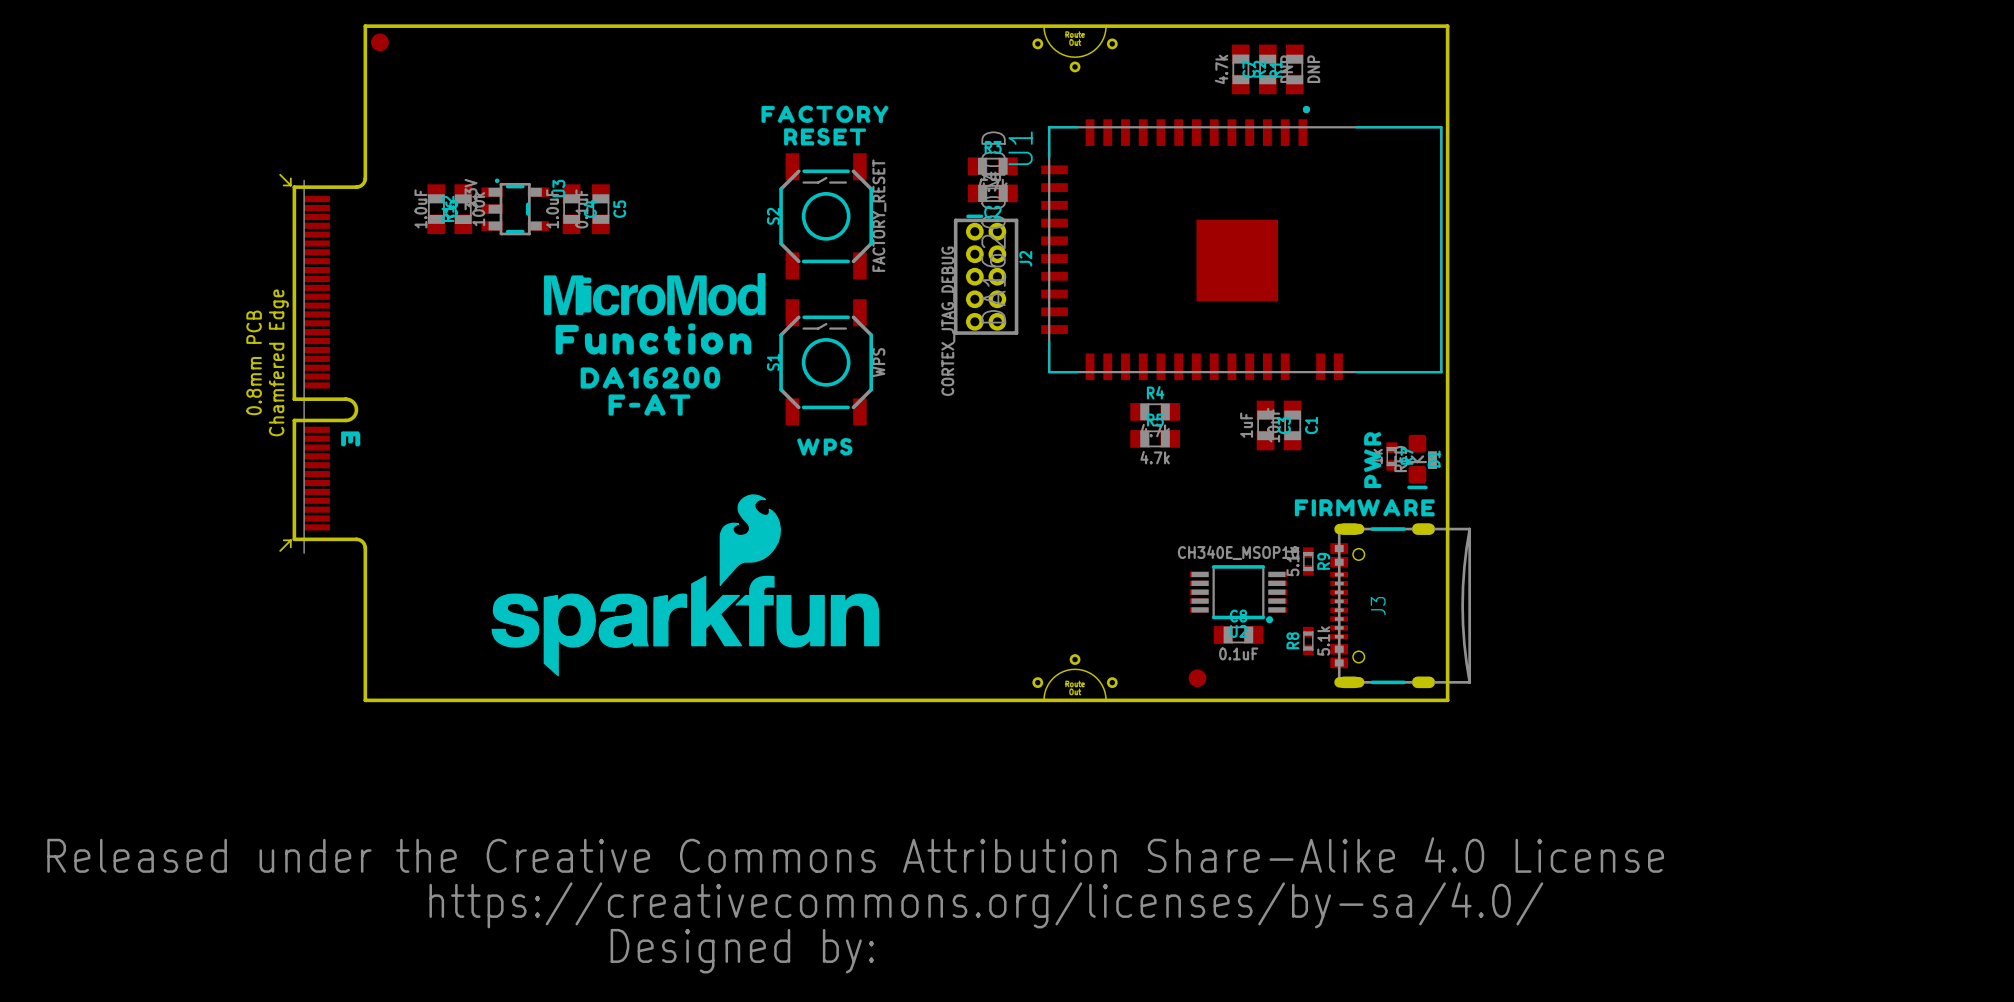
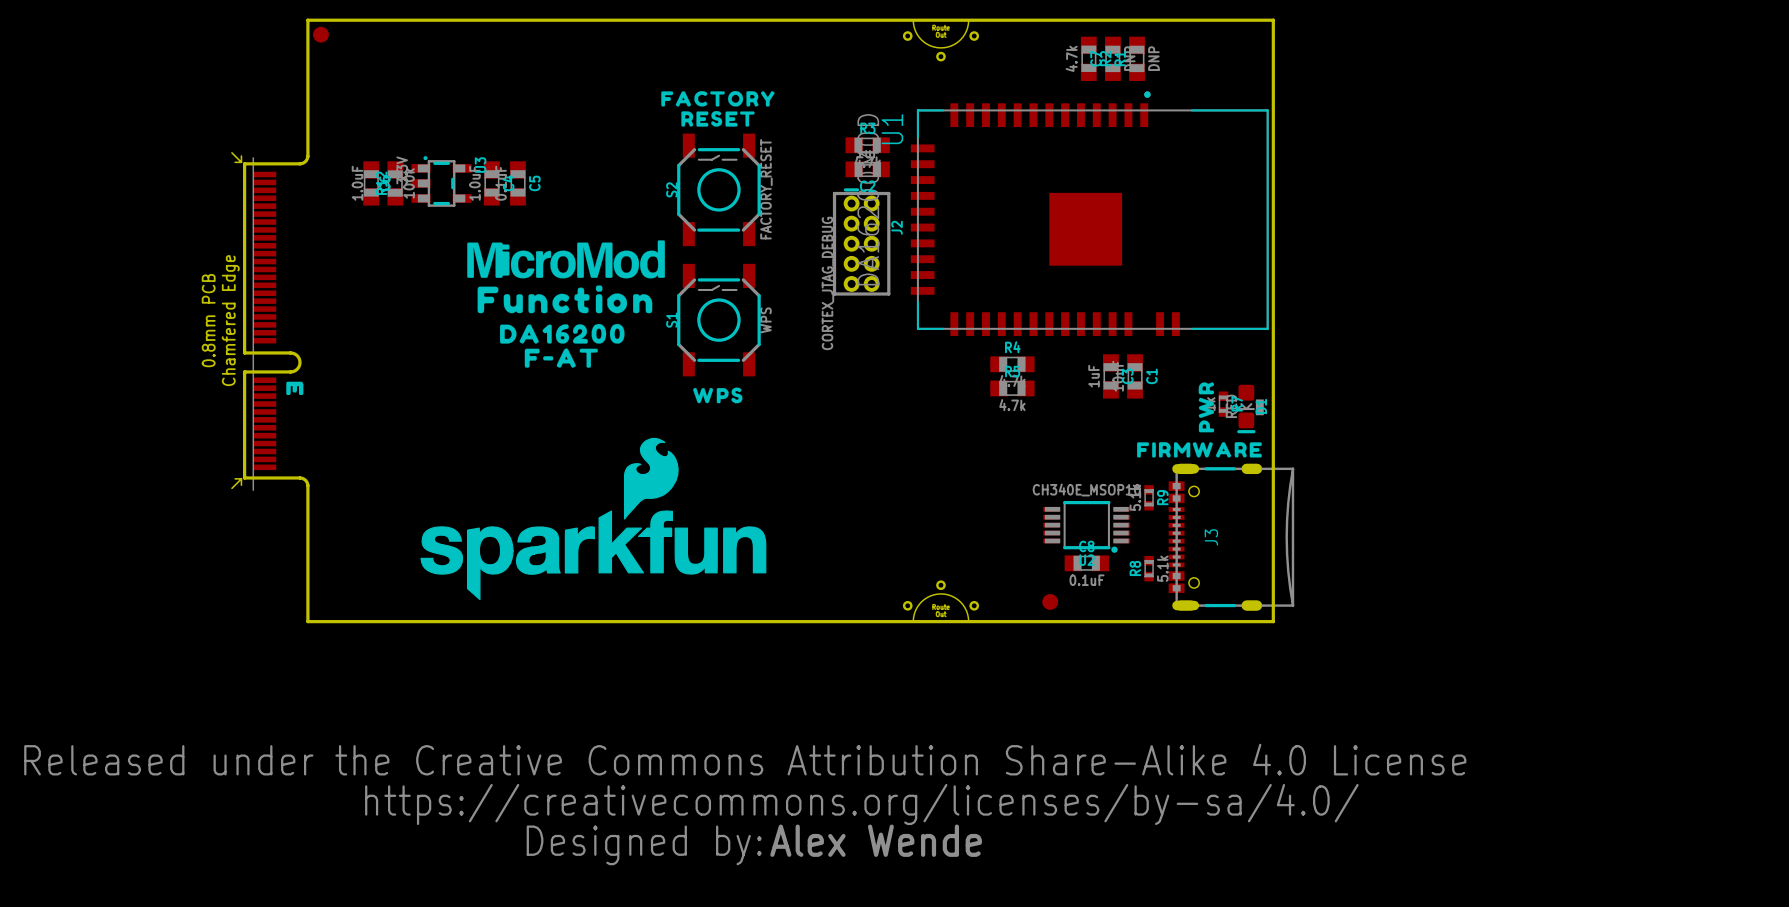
text: none -> Alex Wende (876, 840)

